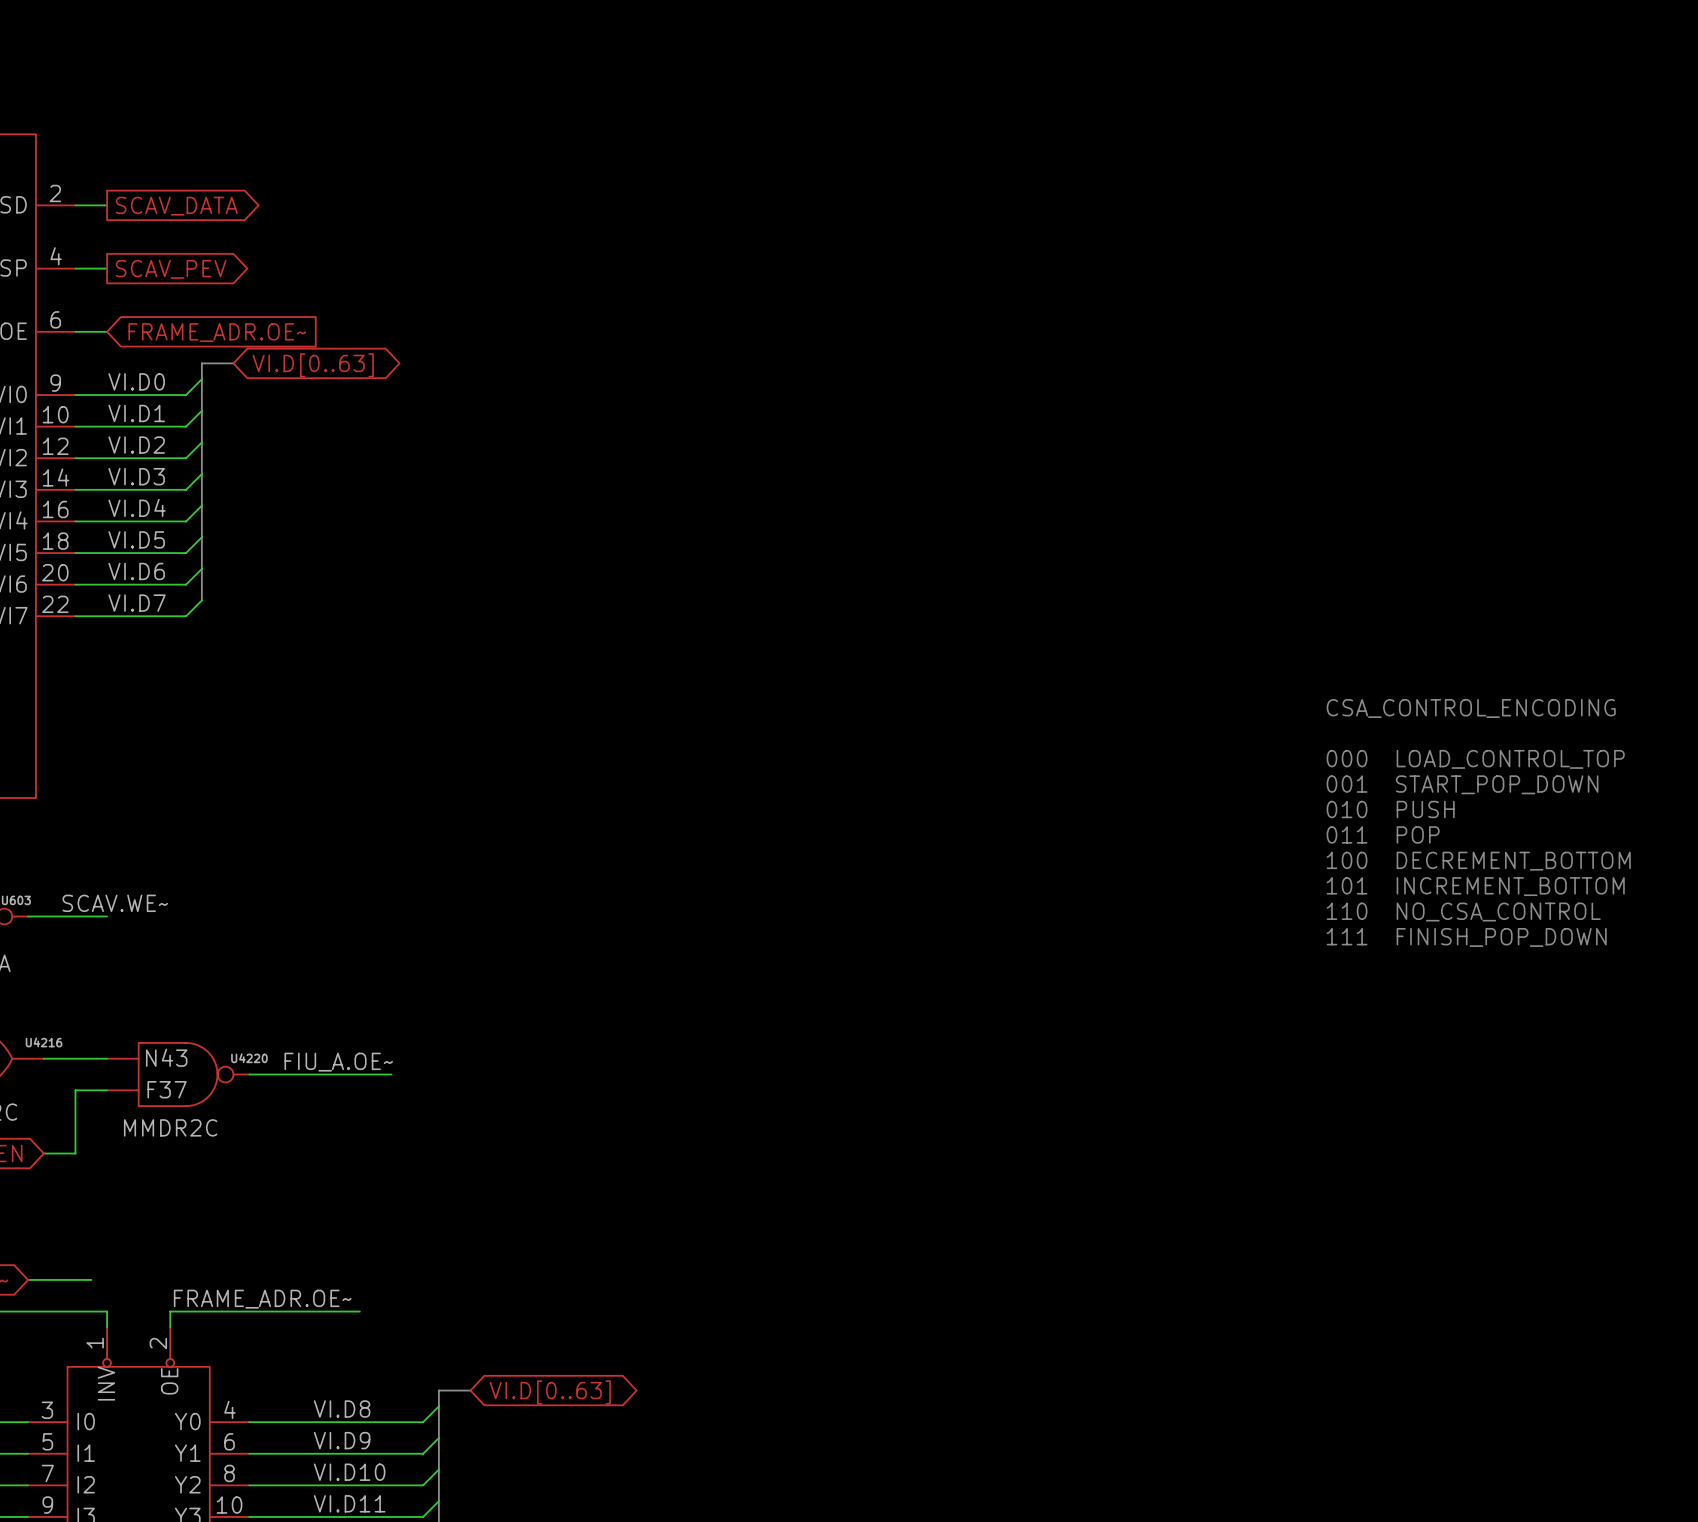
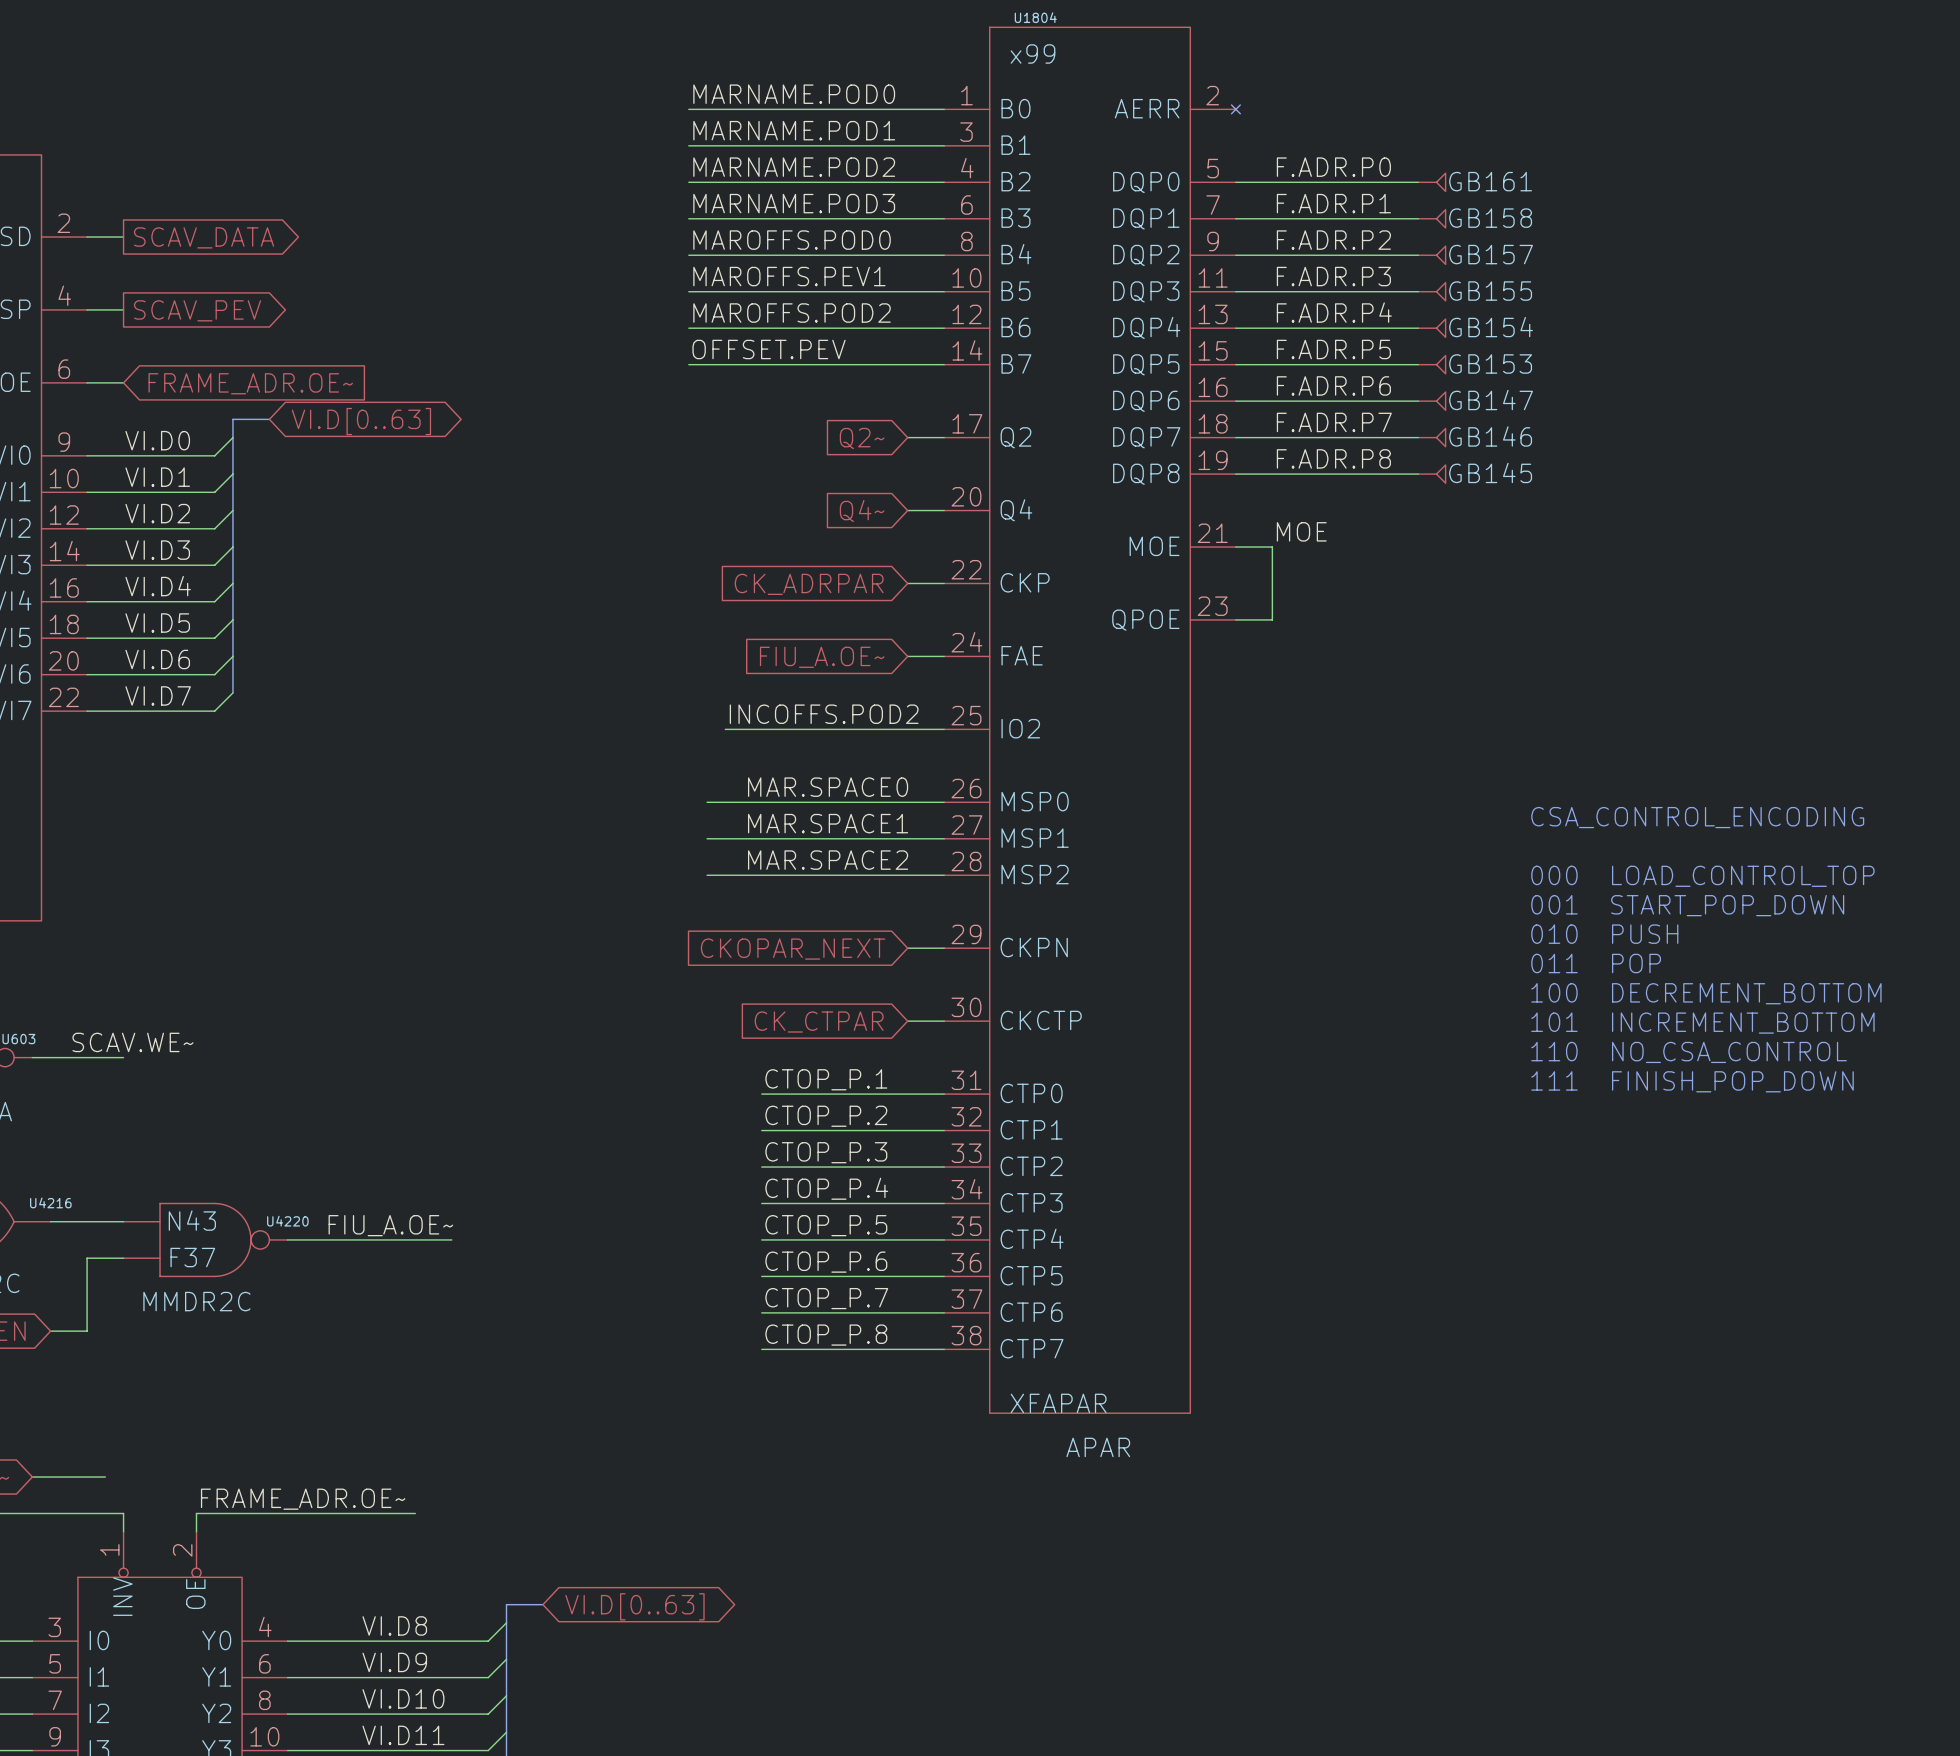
label: none -> MARNAME.POD0 (794, 94)
wire: none -> (688, 109) (944, 109)
no-connect mark: none -> (1235, 109)
label: none -> MARNAME.POD1 (794, 130)
wire: none -> (688, 145) (944, 145)
label: none -> MARNAME.POD2 (794, 167)
label: none -> F.ADR.P0 (1333, 167)
wire: none -> (688, 182) (944, 182)
wire: none -> (1235, 182) (1418, 182)
GB161: none -> (1432, 182)
label: none -> MARNAME.POD3 (794, 203)
label: none -> F.ADR.P1 (1333, 203)
wire: none -> (688, 218) (944, 218)
wire: none -> (1235, 218) (1418, 218)
GB158: none -> (1432, 218)
label: none -> MAROFFS.POD0 (792, 240)
label: none -> F.ADR.P2 (1333, 240)
wire: none -> (688, 255) (944, 255)
wire: none -> (1235, 255) (1418, 255)
GB157: none -> (1432, 255)
label: none -> MAROFFS.PEV1 (789, 276)
label: none -> F.ADR.P3 (1333, 276)
wire: none -> (688, 291) (944, 291)
wire: none -> (1235, 291) (1418, 291)
GB155: none -> (1432, 291)
label: none -> F.ADR.P4 (1334, 312)
label: none -> MAROFFS.POD2 (792, 313)
wire: none -> (688, 328) (944, 328)
wire: none -> (1235, 328) (1418, 328)
GB154: none -> (1432, 328)
label: none -> OFFSET.PEV (769, 349)
label: none -> F.ADR.P5 (1333, 349)
wire: none -> (688, 364) (944, 364)
wire: none -> (1235, 364) (1418, 364)
GB153: none -> (1432, 364)
label: none -> F.ADR.P6 (1333, 385)
wire: none -> (1235, 401) (1418, 401)
GB147: none -> (1432, 401)
label: none -> F.ADR.P7 (1334, 422)
global label: none -> Q2~ (862, 438)
wire: none -> (907, 437) (944, 437)
wire: none -> (1235, 437) (1418, 437)
GB146: none -> (1432, 437)
label: none -> F.ADR.P8 (1333, 458)
wire: none -> (1235, 474) (1418, 474)
GB145: none -> (1432, 474)
global label: none -> Q4~ (862, 510)
wire: none -> (907, 510) (944, 510)
label: none -> MOE (1301, 531)
wire: none -> (1235, 547) (1272, 547) (1272, 619) (1235, 619)
wire: none -> (907, 583) (944, 583)
global label: none -> CK_ADRPAR (809, 584)
wire: none -> (907, 656) (944, 656)
global label: none -> FIU_A.OE~ (822, 657)
label: none -> INCOFFS.POD2 (824, 714)
U1804: none -> XFAPAR (1090, 720)
wire: none -> (725, 729) (944, 729)
label: none -> MAR.SPACE0 (828, 787)
wire: none -> (707, 802) (944, 802)
label: none -> MAR.SPACE1 (828, 823)
wire: none -> (707, 838) (944, 838)
label: none -> MAR.SPACE2 (828, 860)
wire: none -> (707, 875) (944, 875)
wire: none -> (907, 948) (944, 948)
global label: none -> CKOPAR_NEXT (793, 949)
wire: none -> (907, 1021) (944, 1021)
global label: none -> CK_CTPAR (819, 1022)
label: none -> CTOP_P.1 (826, 1079)
wire: none -> (761, 1094) (944, 1094)
label: none -> CTOP_P.2 (826, 1116)
wire: none -> (761, 1130) (944, 1130)
label: none -> CTOP_P.3 (826, 1152)
wire: none -> (761, 1167) (944, 1167)
label: none -> CTOP_P.4 (826, 1188)
wire: none -> (761, 1203) (944, 1203)
label: none -> CTOP_P.5 (826, 1225)
wire: none -> (761, 1239) (944, 1239)
label: none -> CTOP_P.6 (826, 1262)
wire: none -> (761, 1276) (944, 1276)
label: none -> CTOP_P.7 (826, 1298)
wire: none -> (761, 1312) (944, 1312)
label: none -> CTOP_P.8 (826, 1335)
wire: none -> (761, 1349) (944, 1349)

